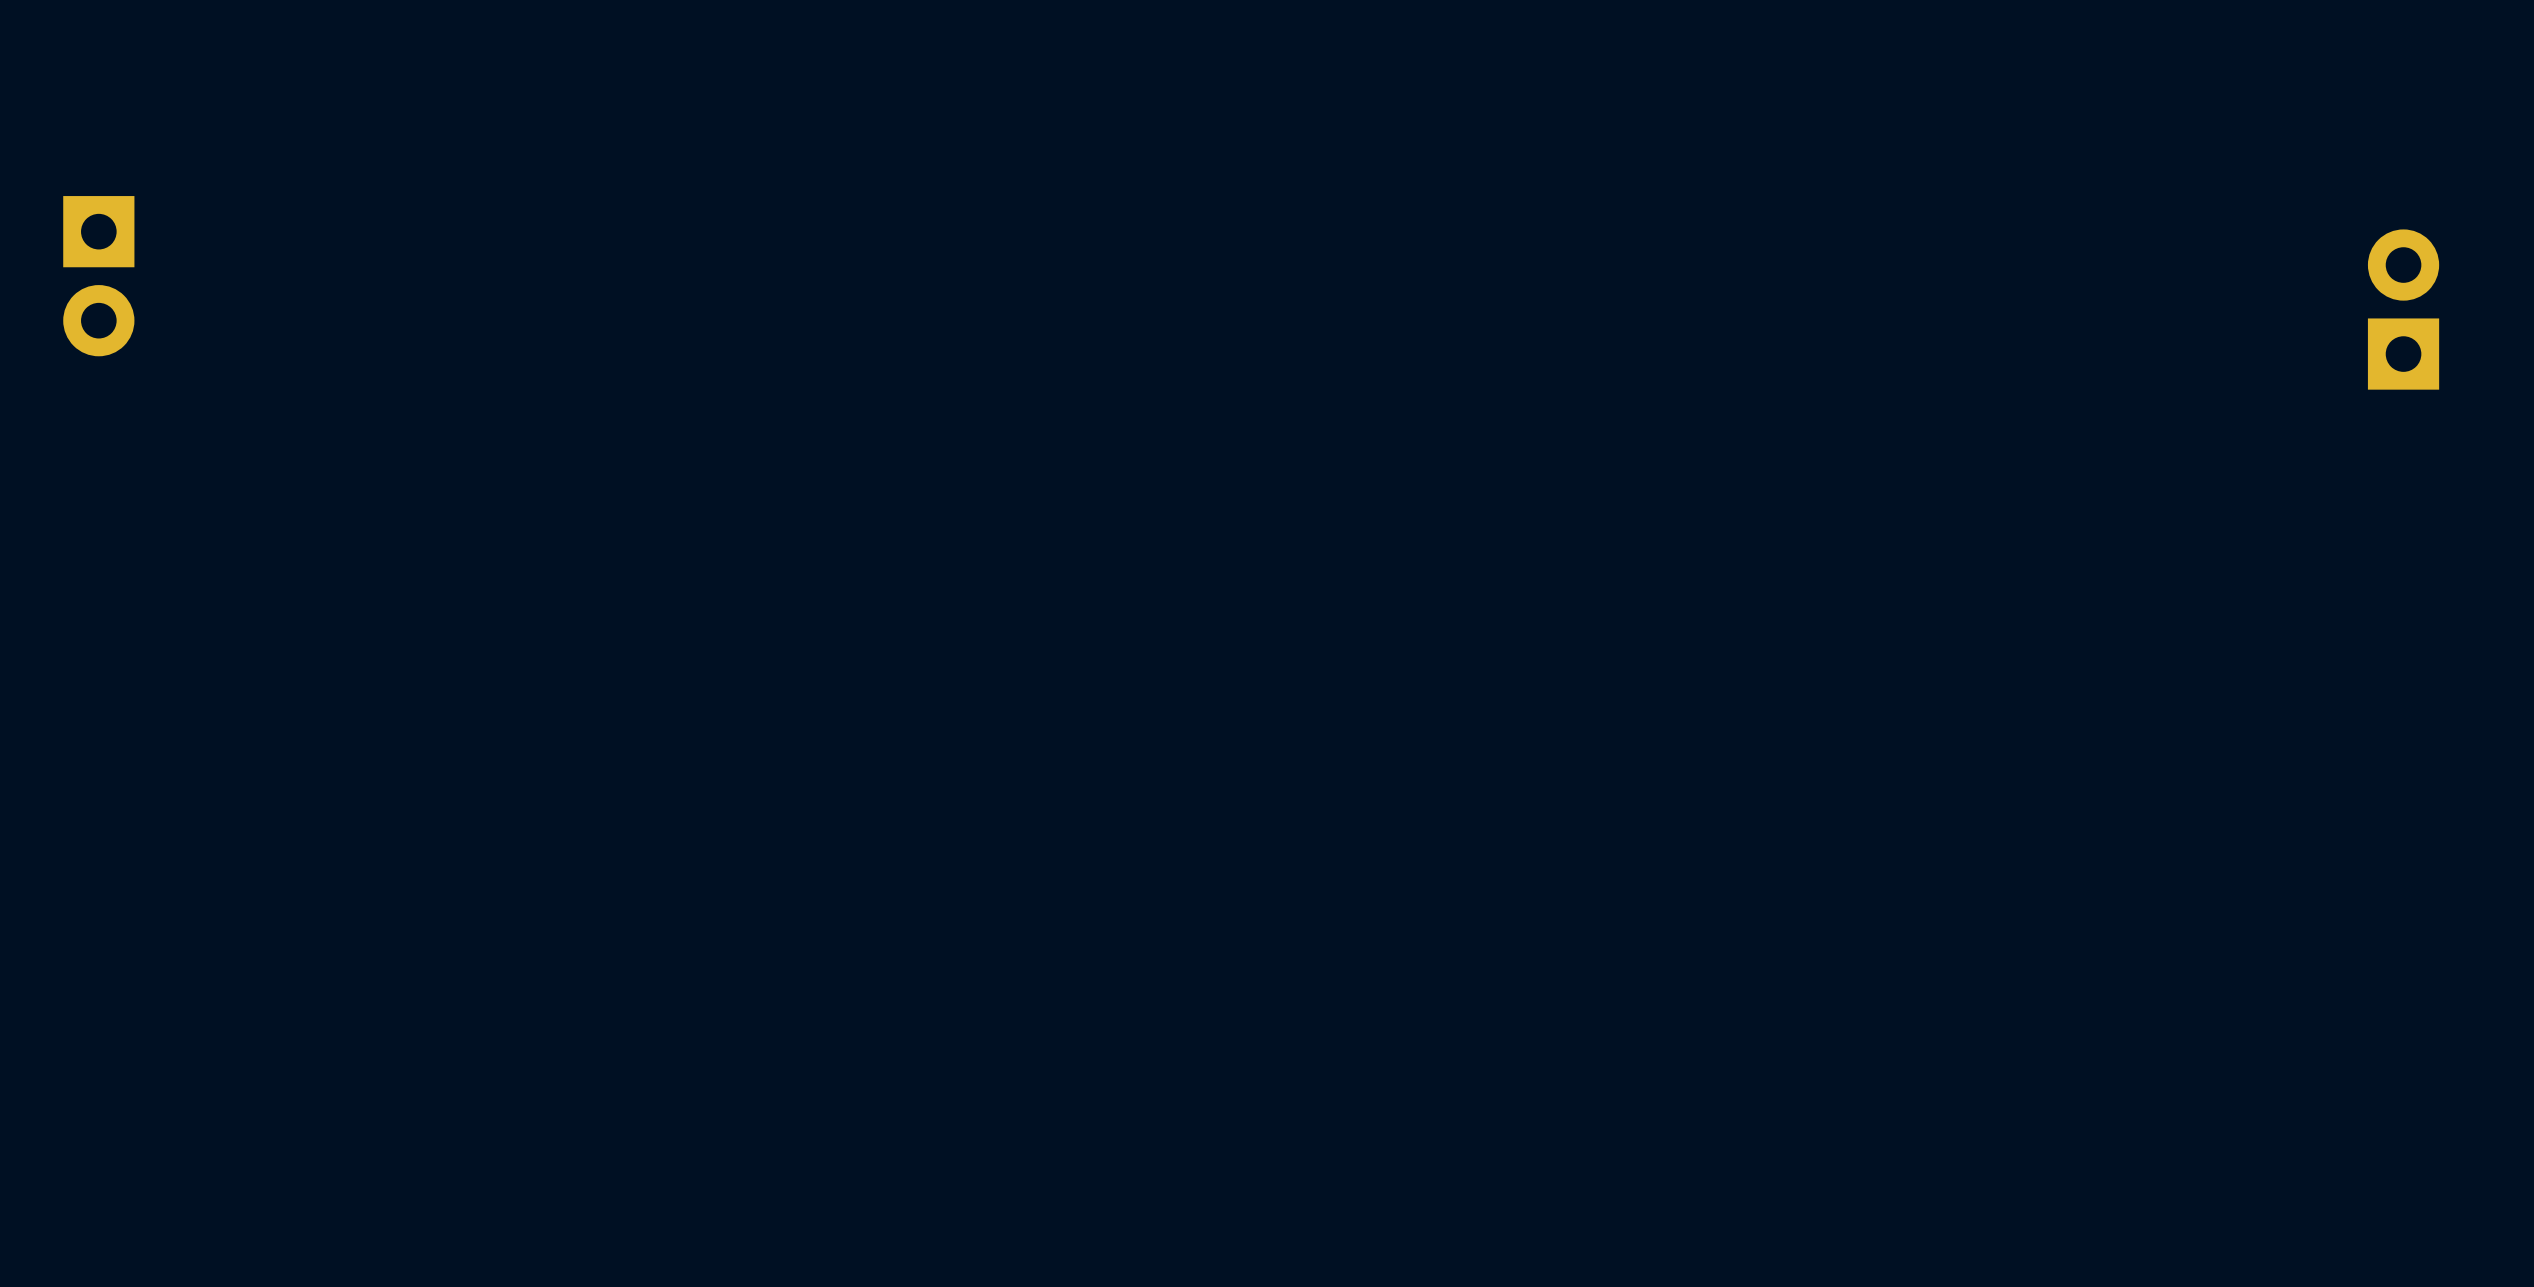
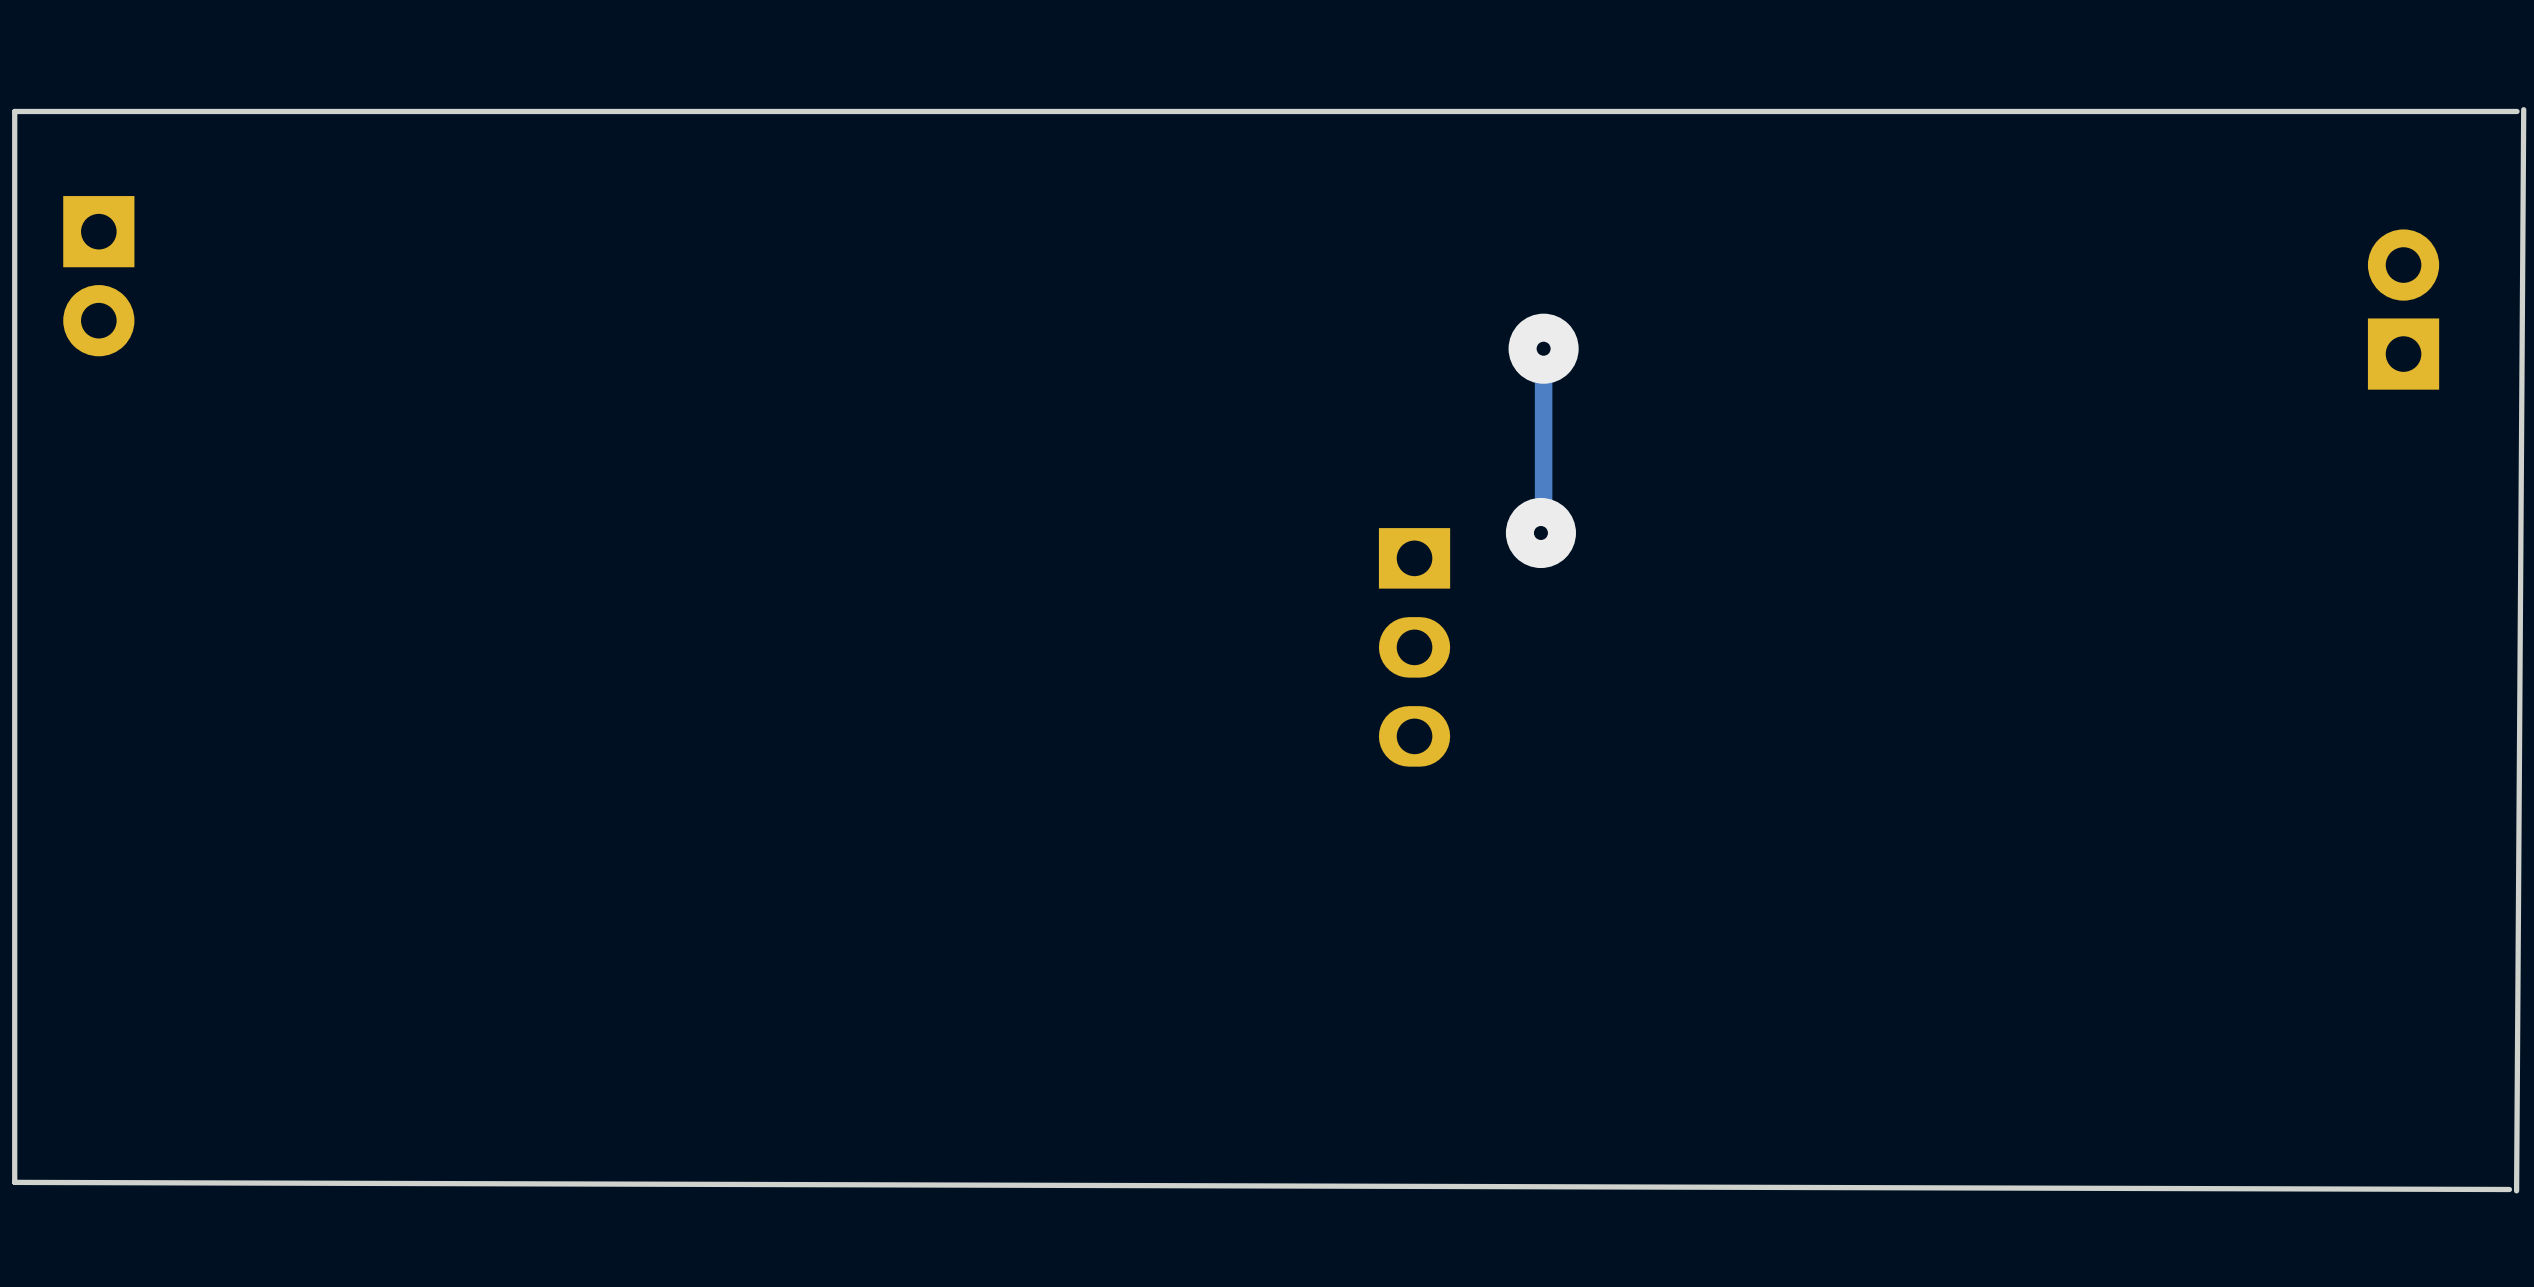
board edge: none -> (2523, 109) (2516, 1190)
board edge: none -> (2517, 111) (14, 111) (14, 1182) (2509, 1189)
track: none -> (1543, 348) (1543, 530) (1540, 532)
via: none -> (1543, 348)
via: none -> (1540, 532)
part: none -> (1414, 647)

